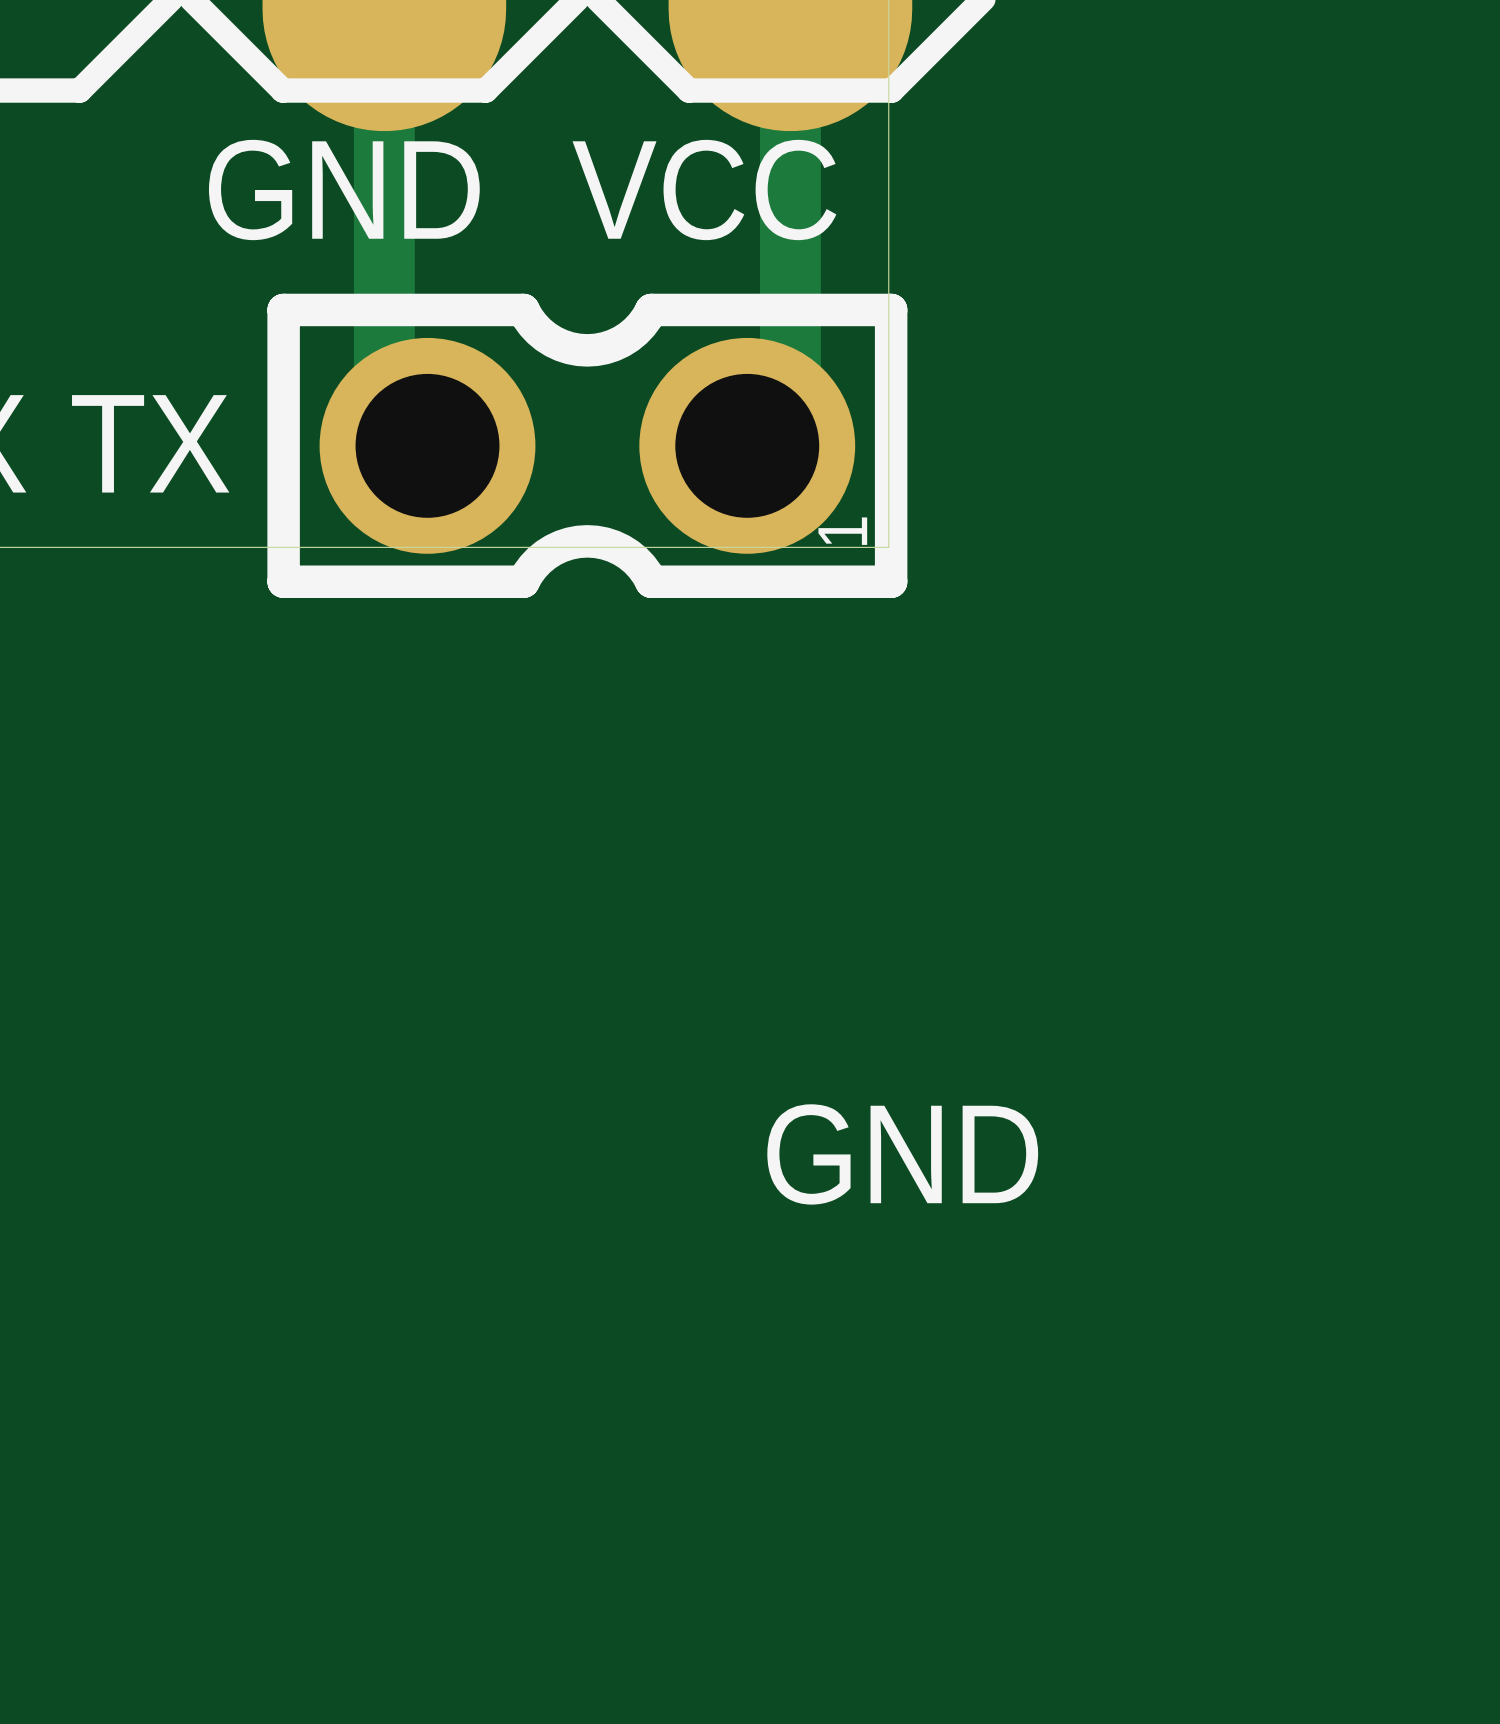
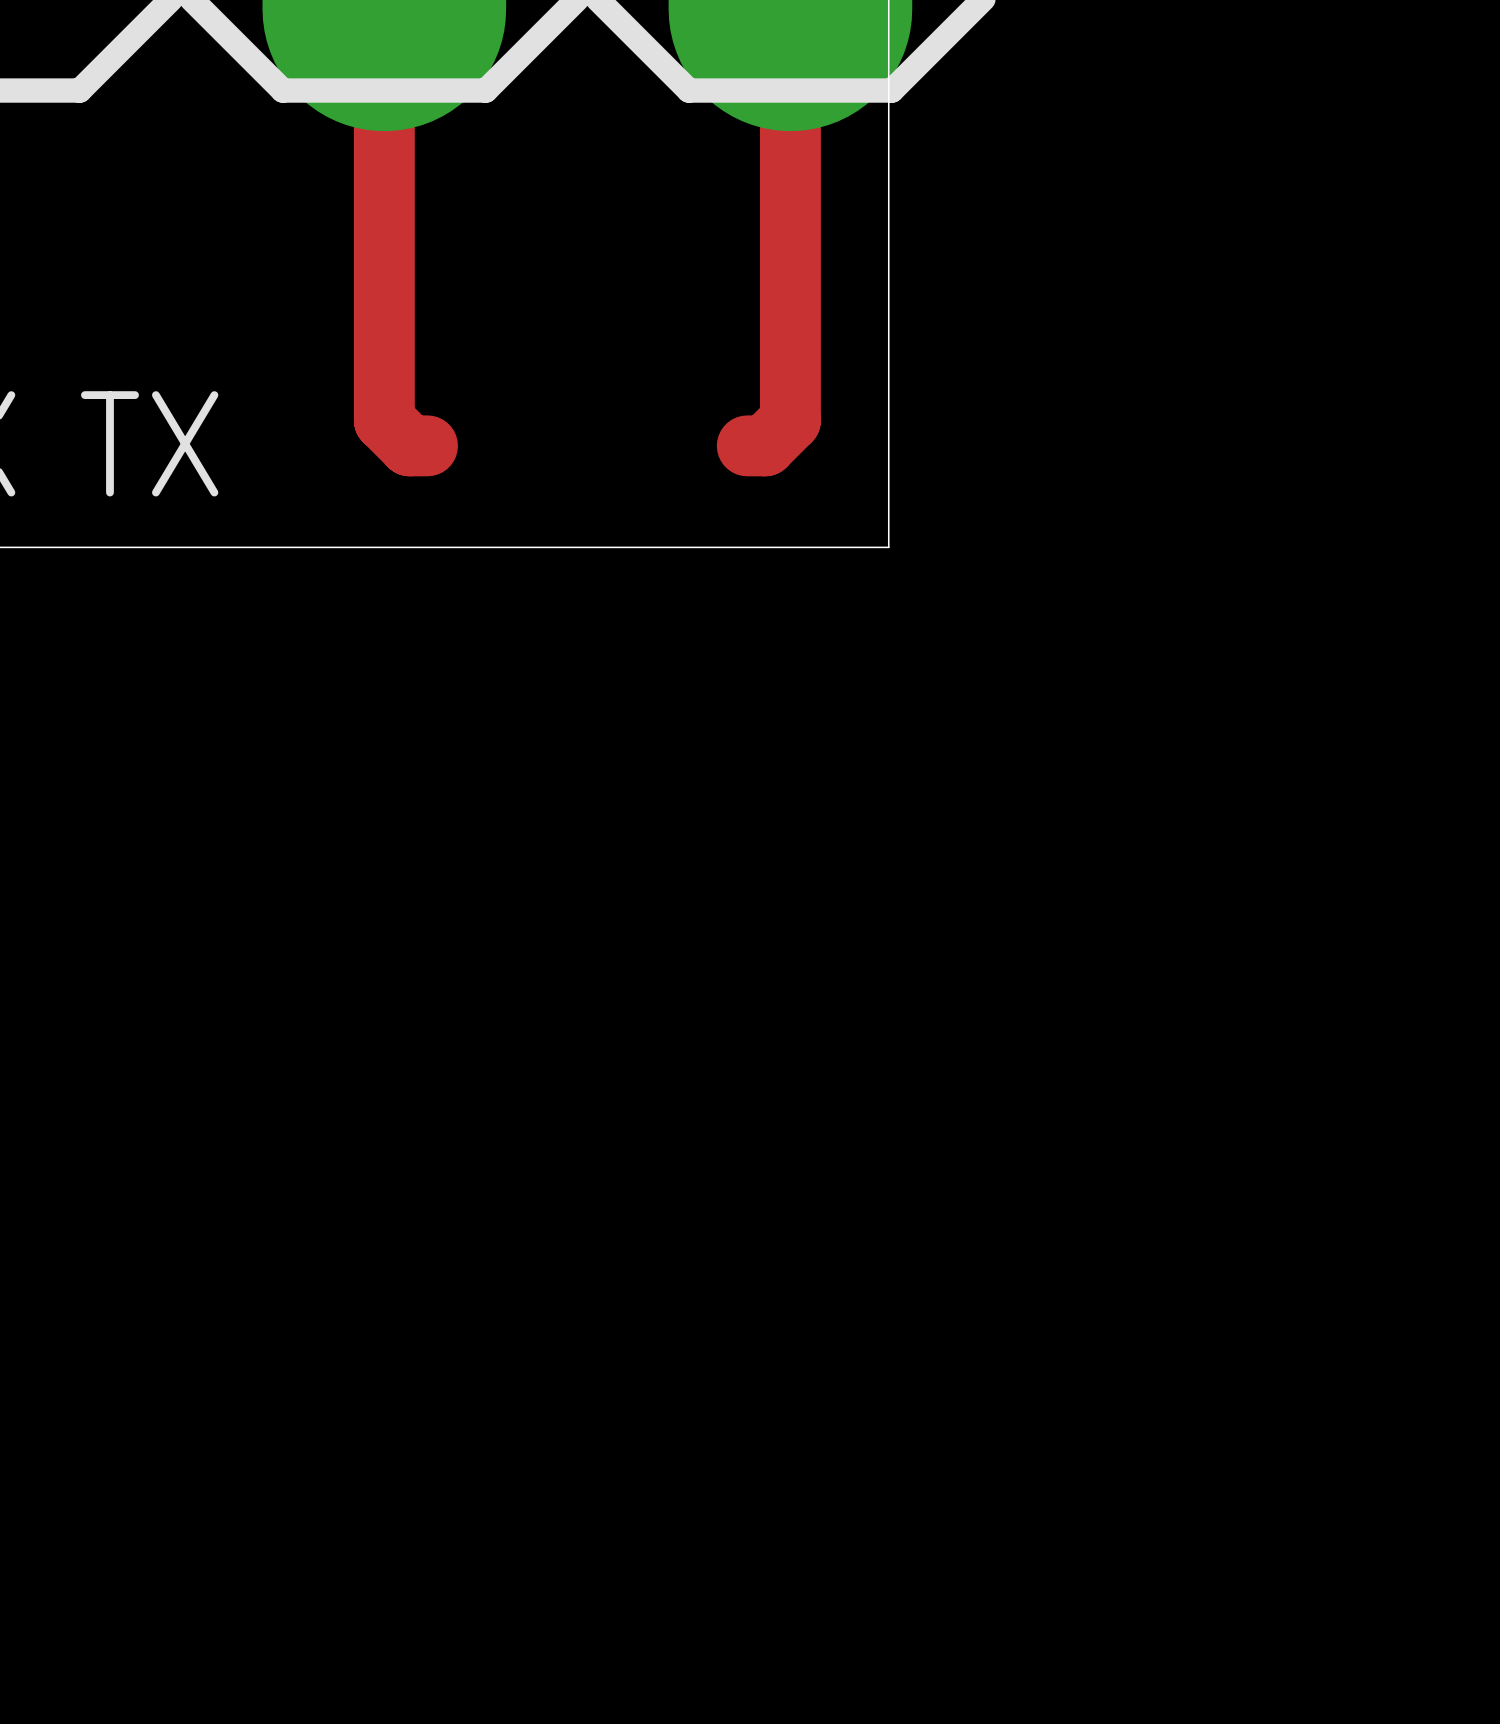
text: GND (344, 189) -> none
text: VCC (704, 189) -> none
part: (587, 445) -> none
text: GND (902, 1154) -> none

